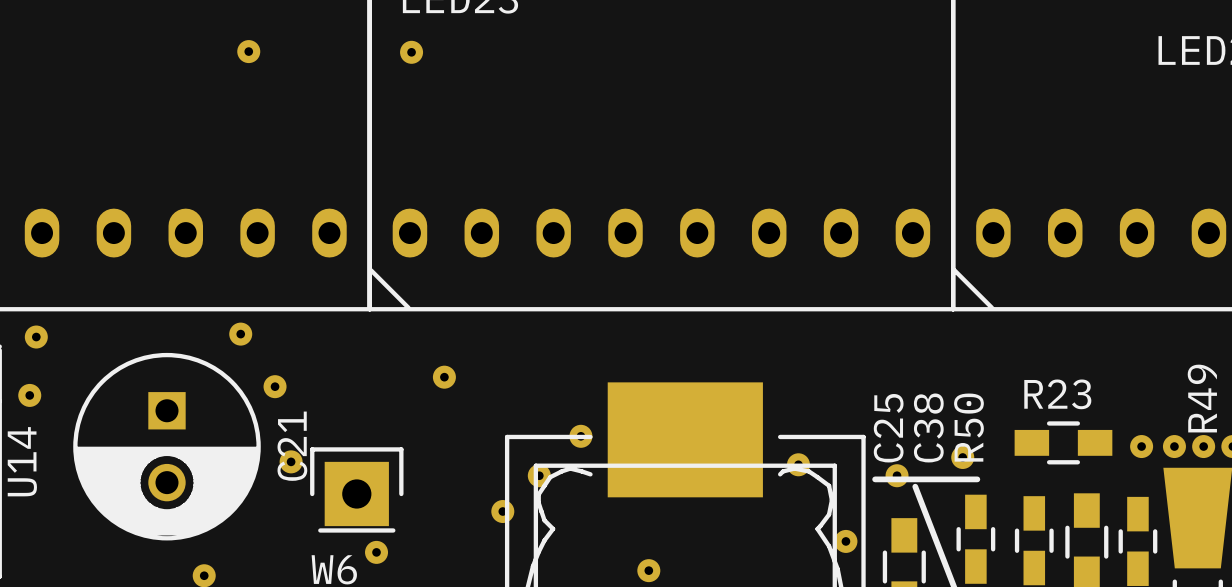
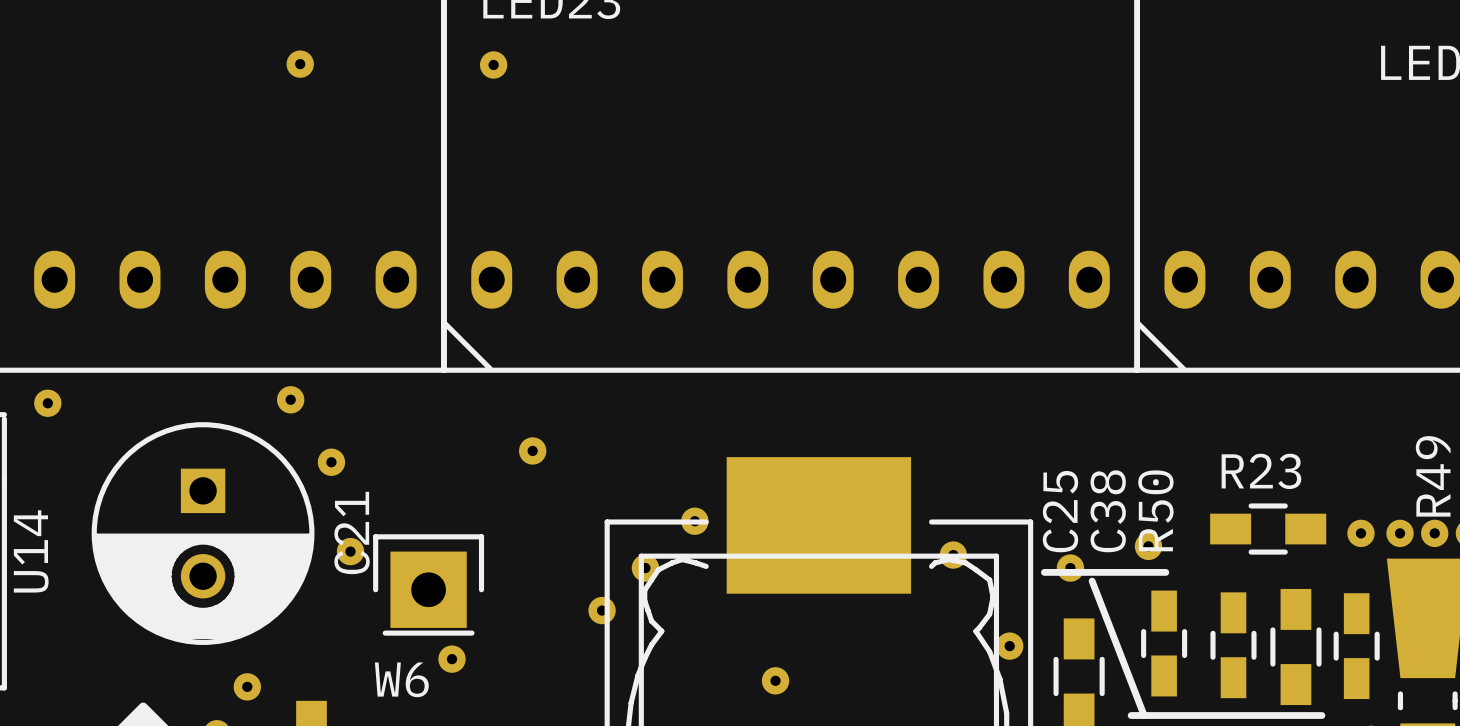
part: (29, 395) -> none

